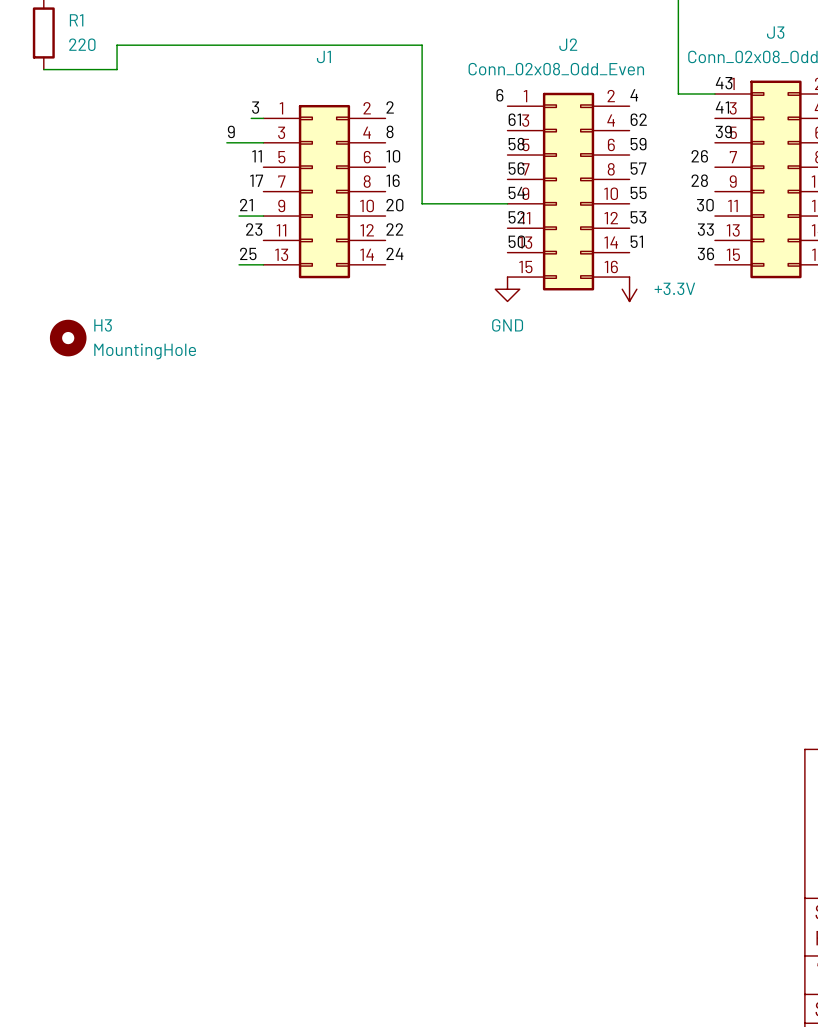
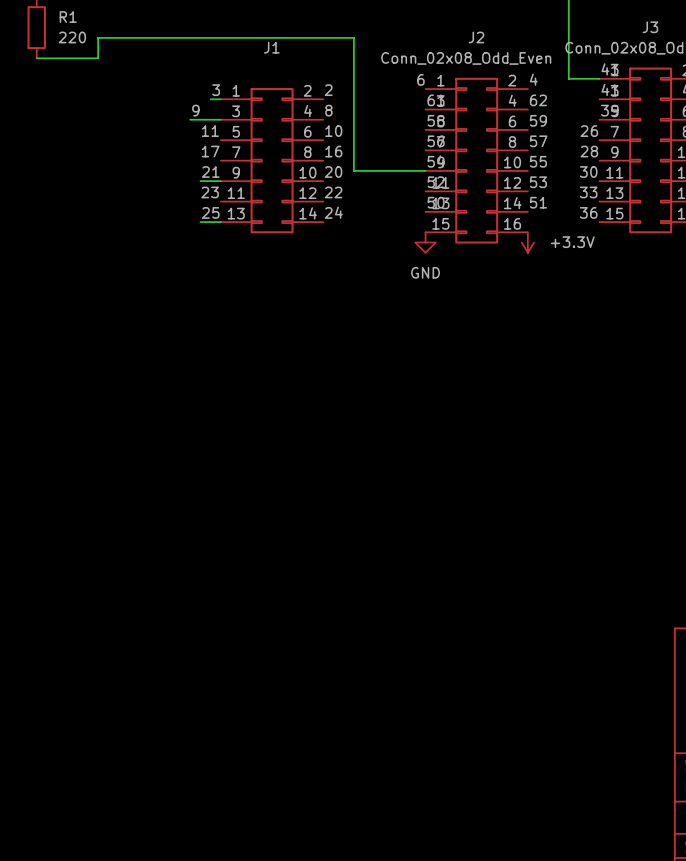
H3: MountingHole (68, 338) -> none

